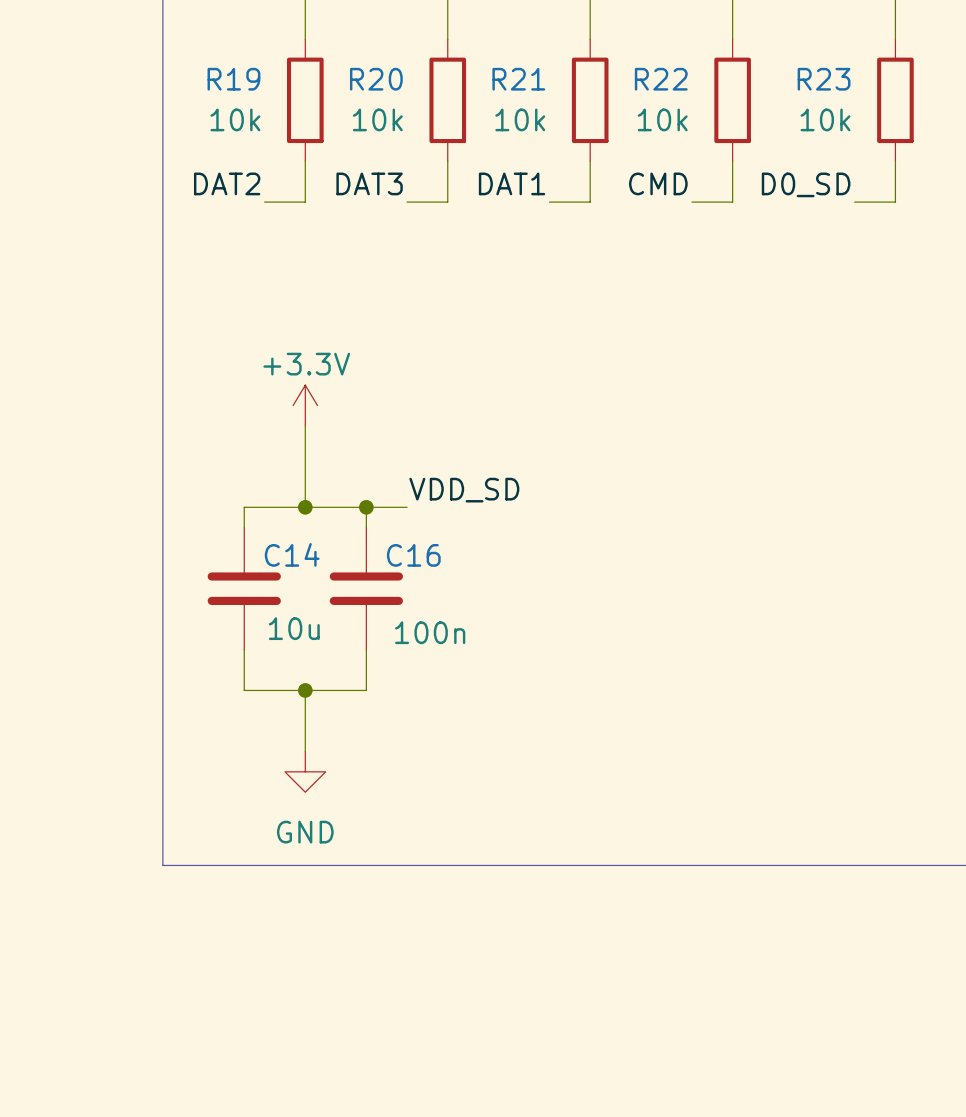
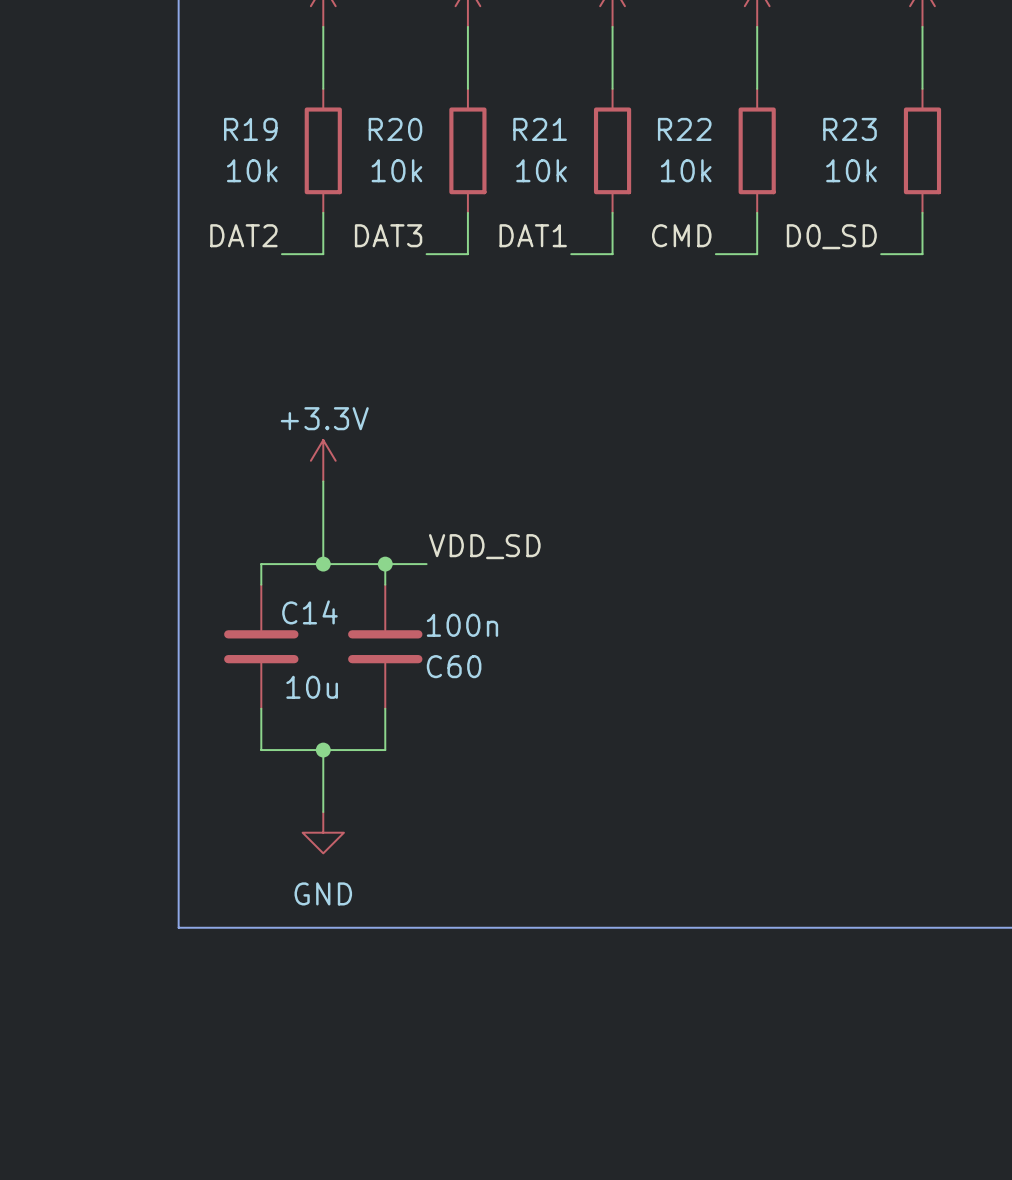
C16 name: C16 (413, 555) -> C60 (454, 666)
C16 value position: 100n (430, 632) -> 100n (462, 625)

